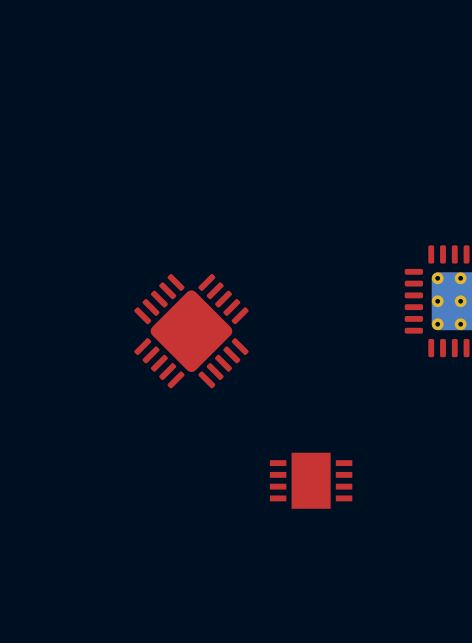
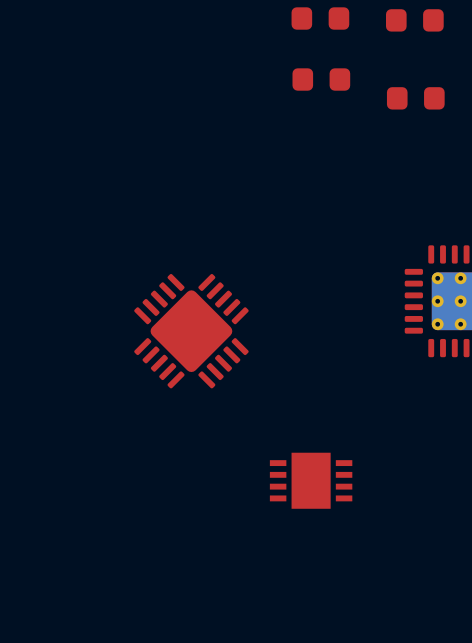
part: none -> (320, 18)
part: none -> (414, 20)
part: none -> (321, 79)
part: none -> (415, 98)

